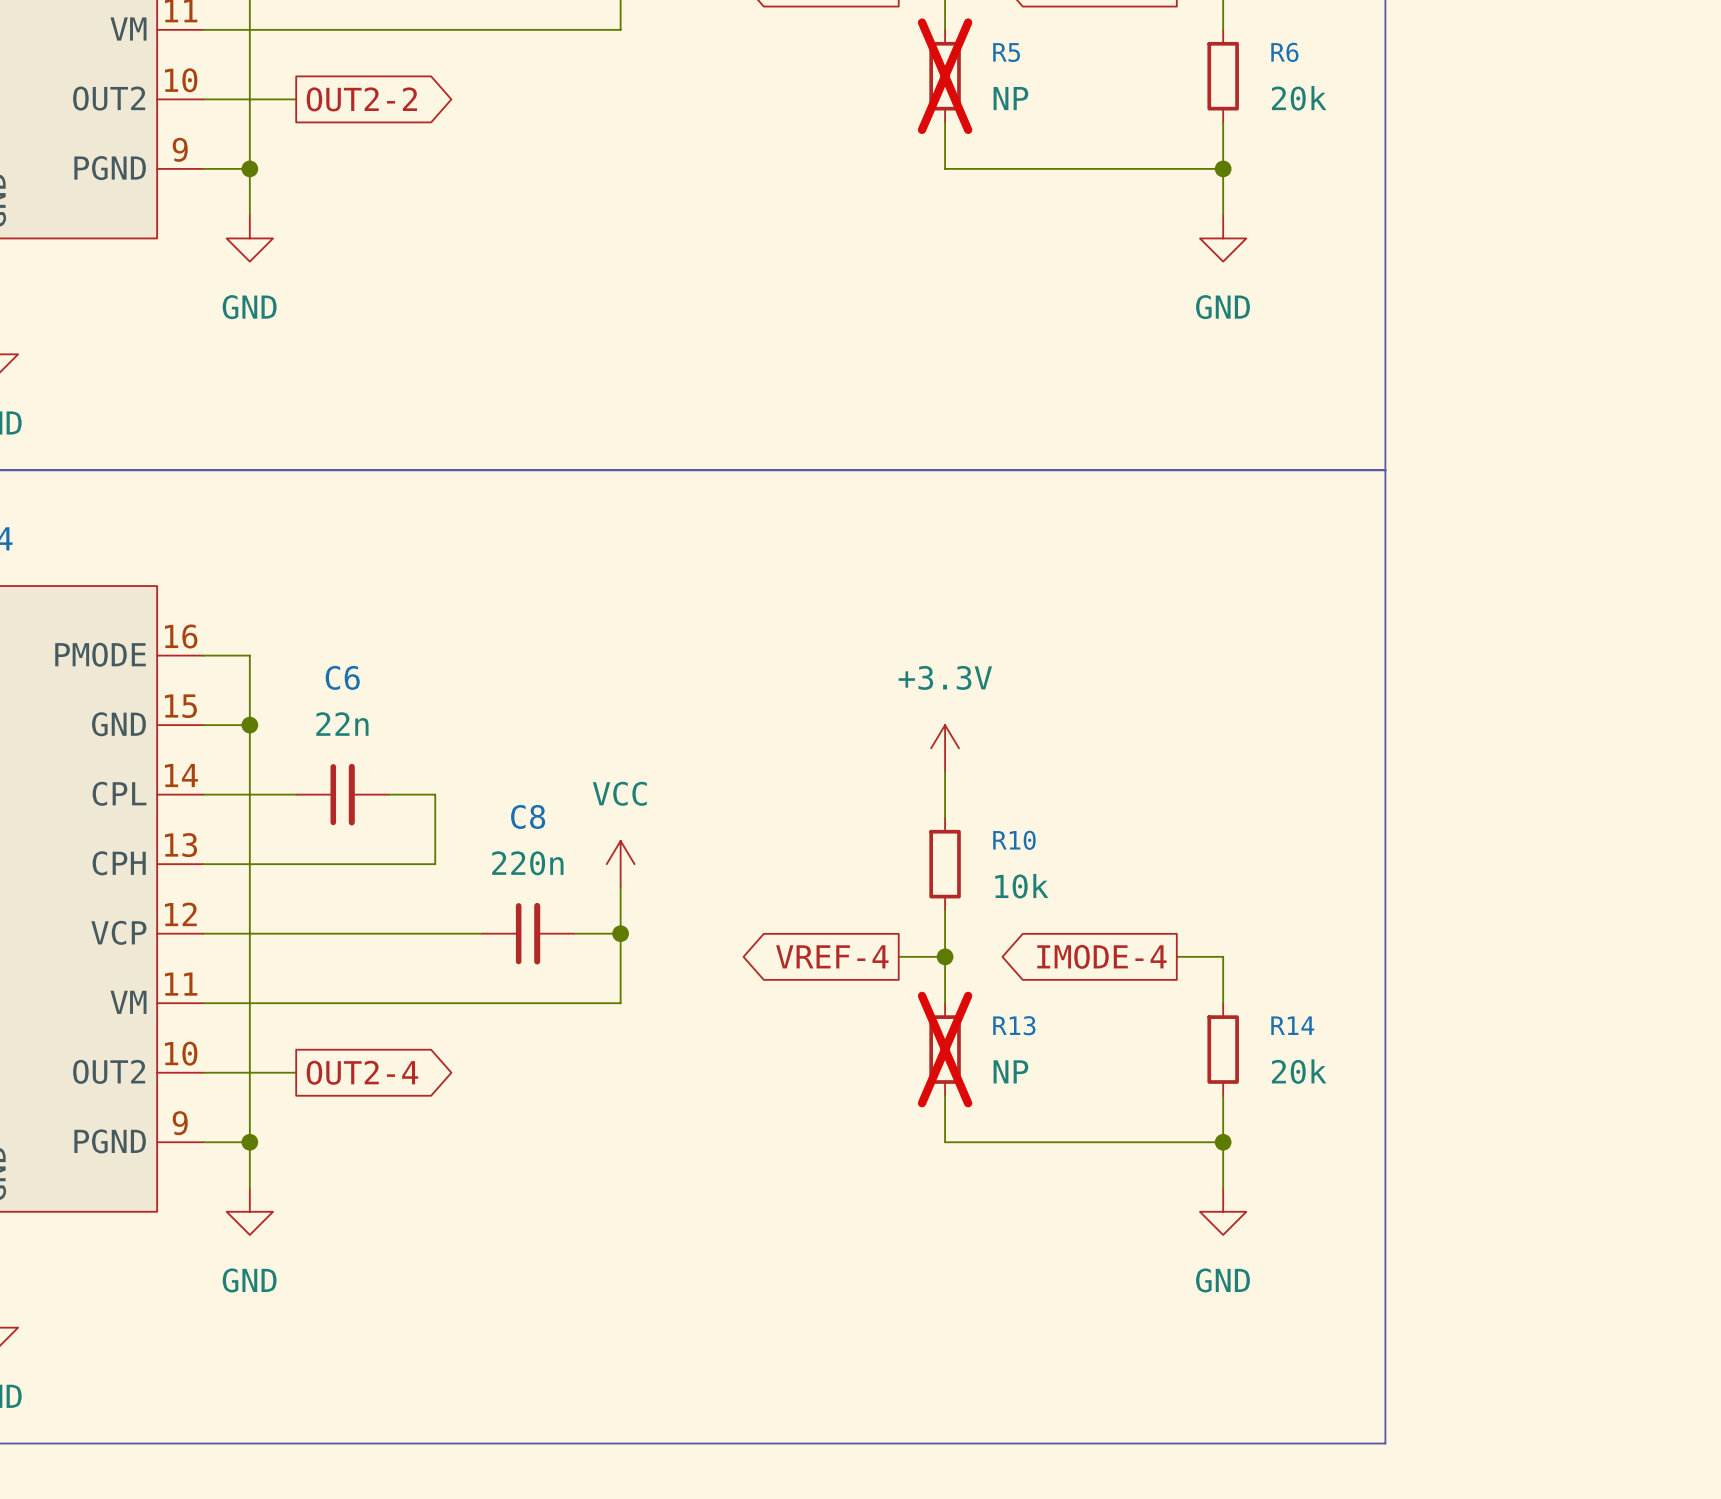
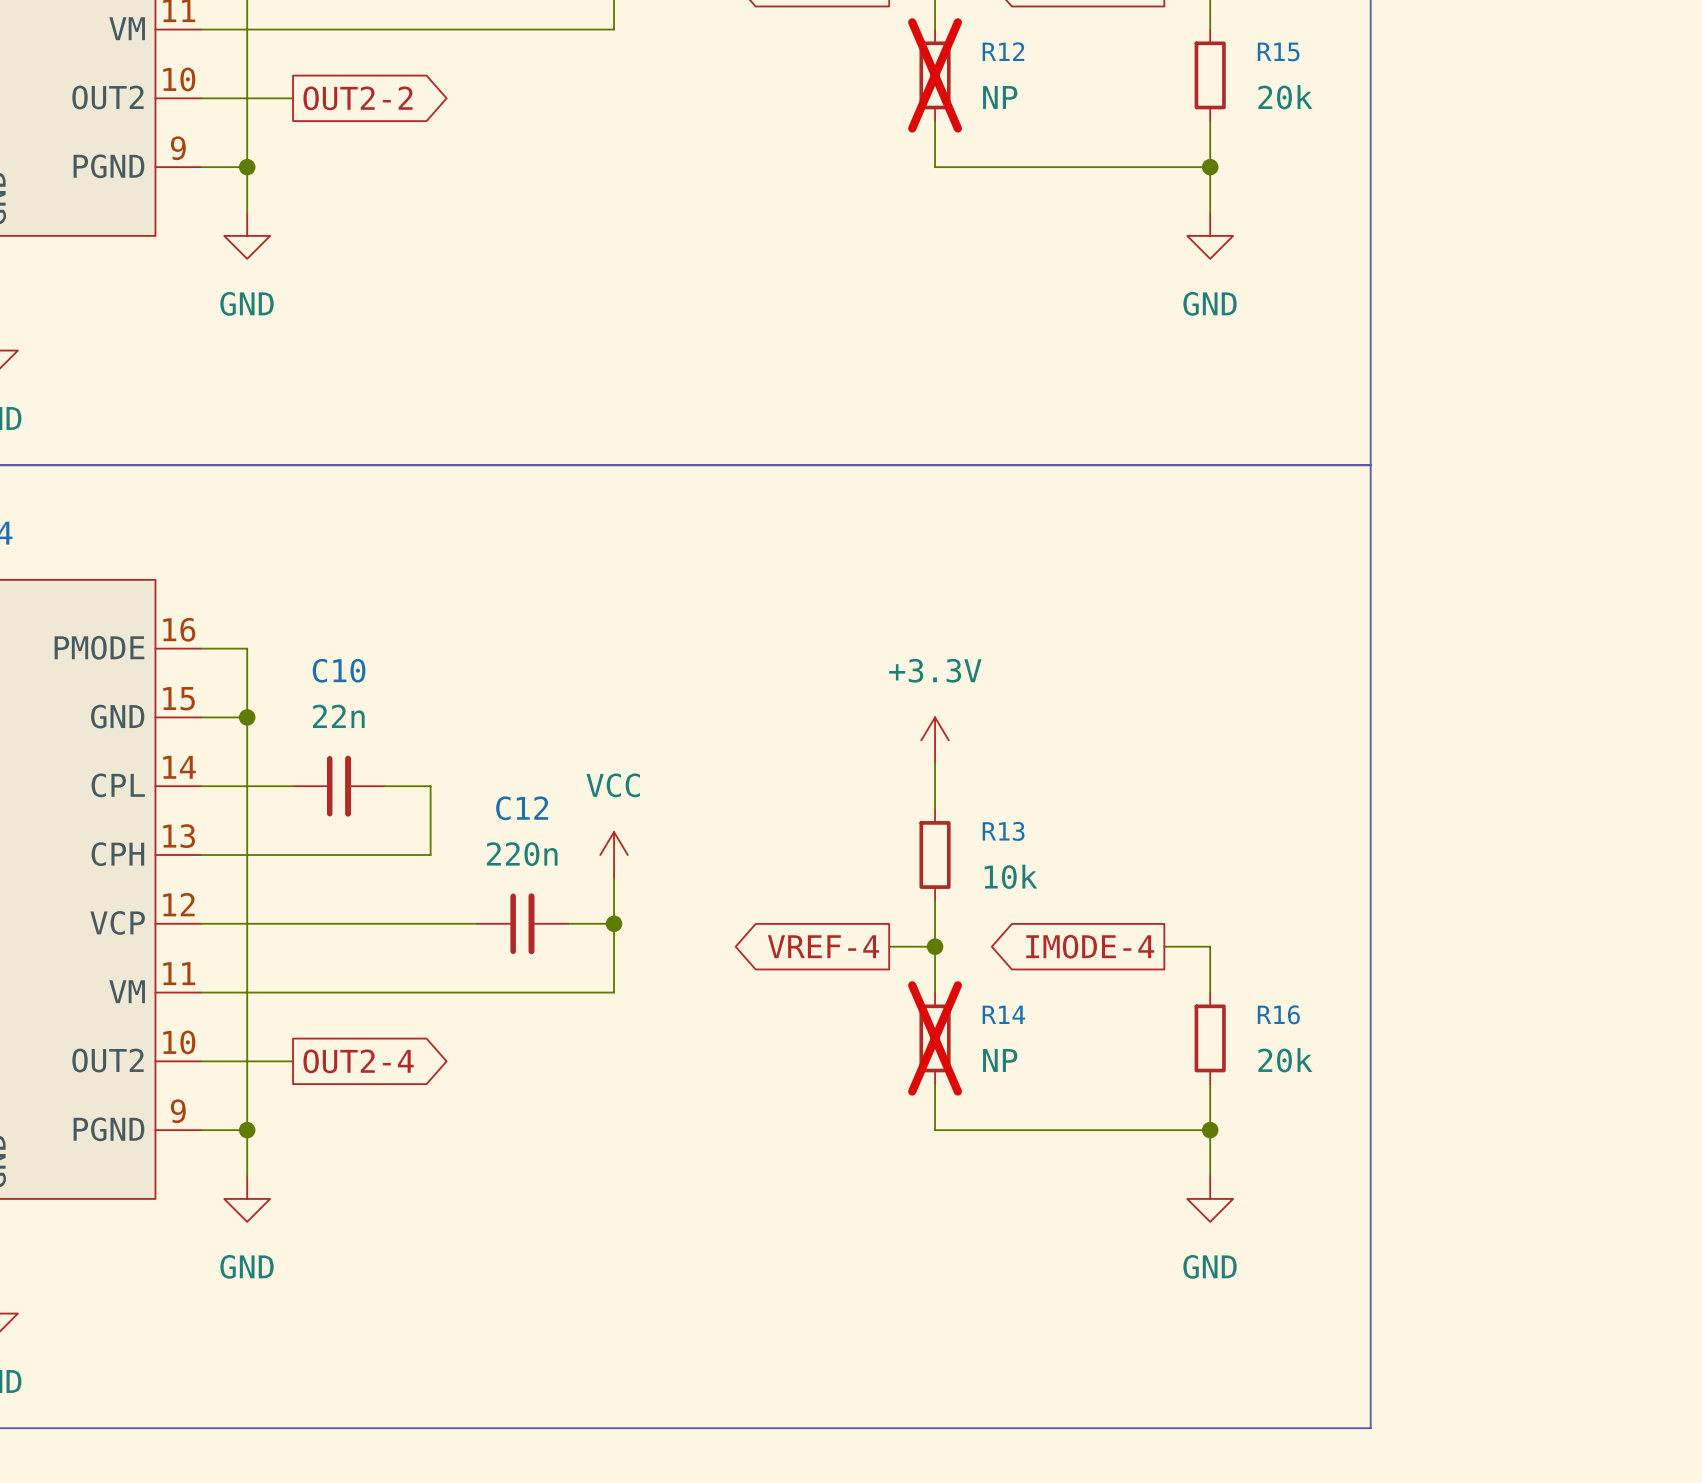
R5 name: R5 (1006, 52) -> R12 (1003, 51)
R6 name: R6 (1284, 52) -> R15 (1278, 51)
C6 name: C6 (342, 677) -> C10 (339, 670)
C8 name: C8 (528, 816) -> C12 (522, 808)
R10 name: R10 (1014, 840) -> R13 (1003, 831)
R13 name: R13 (1014, 1025) -> R14 (1003, 1014)
R14 name: R14 (1292, 1025) -> R16 (1278, 1014)

